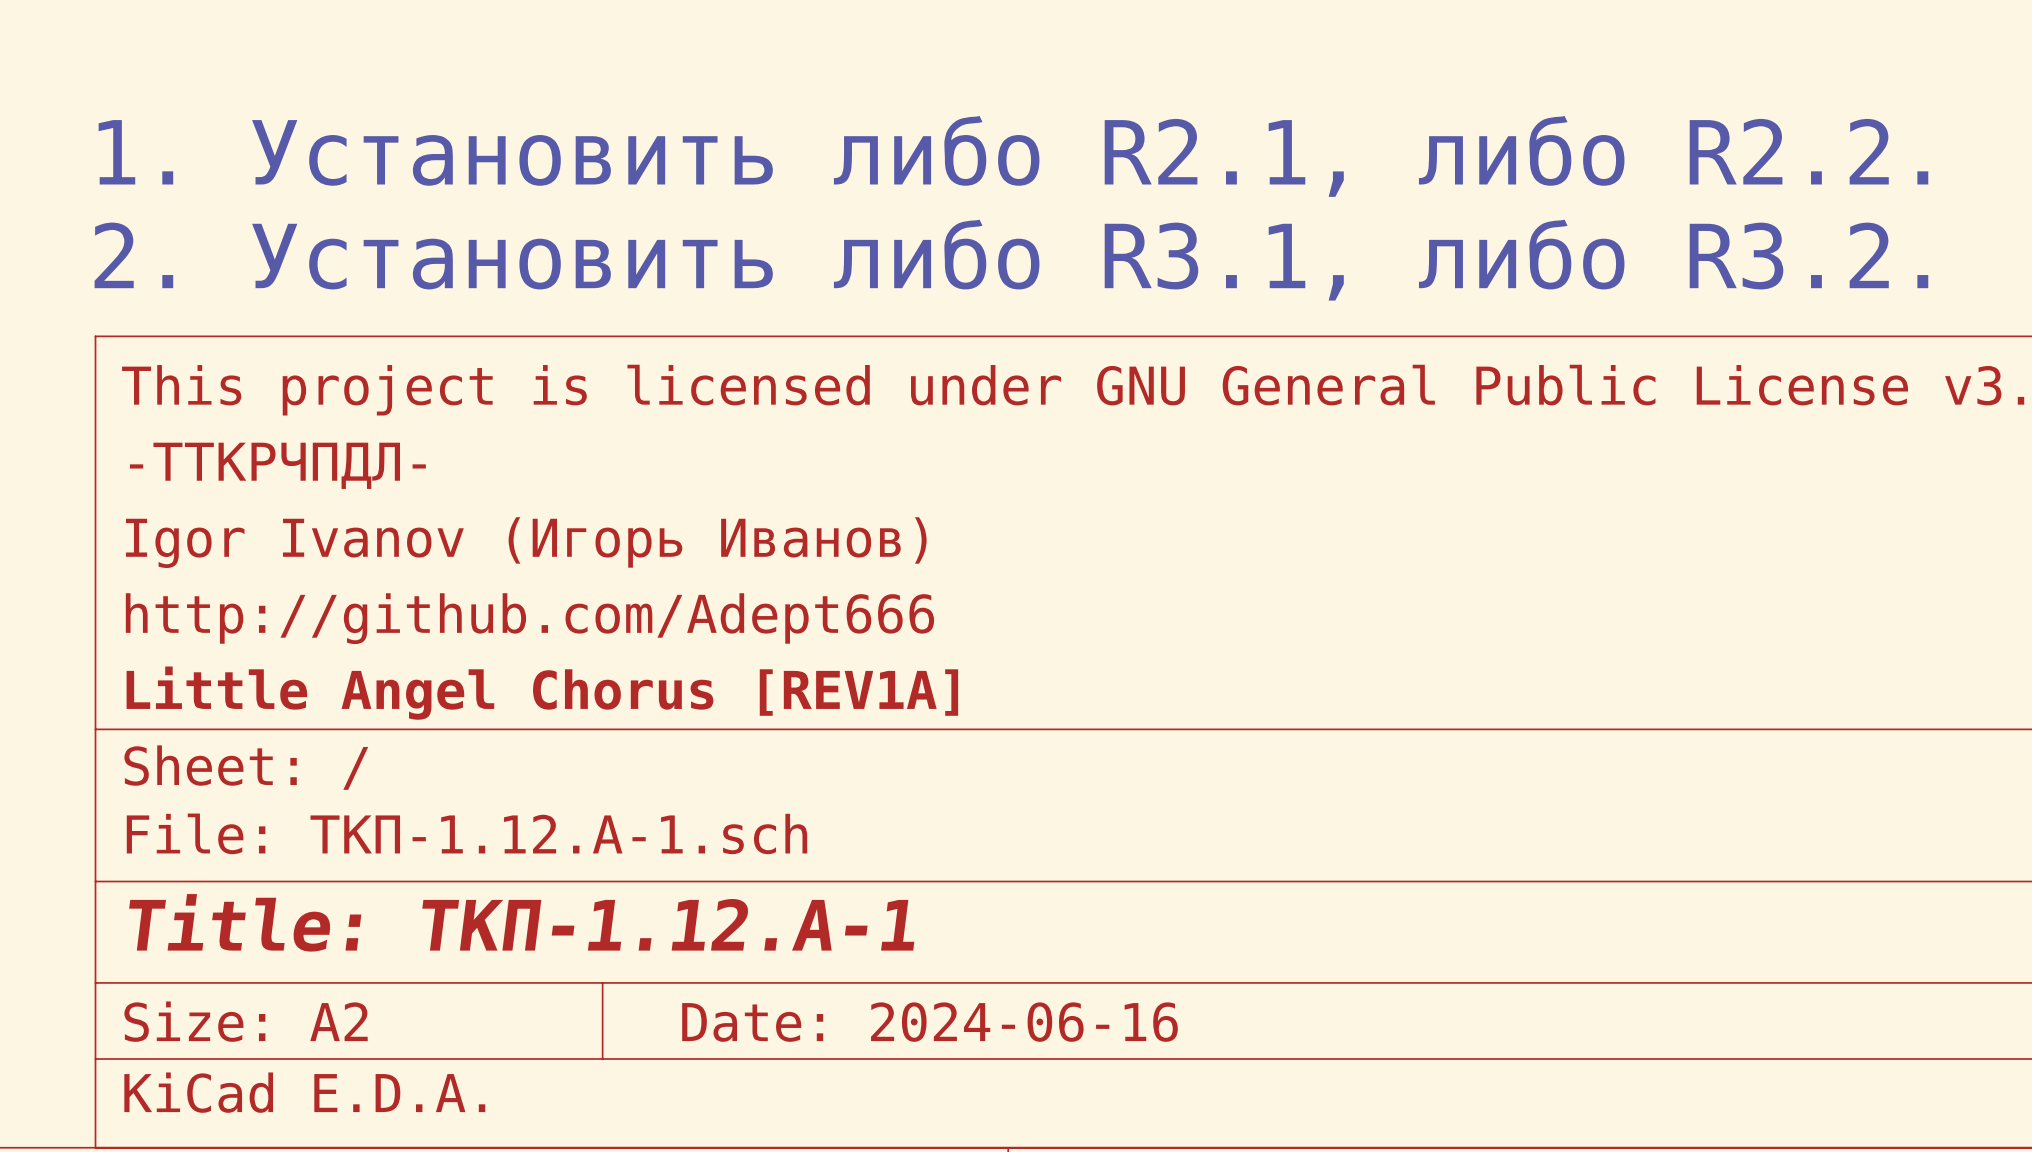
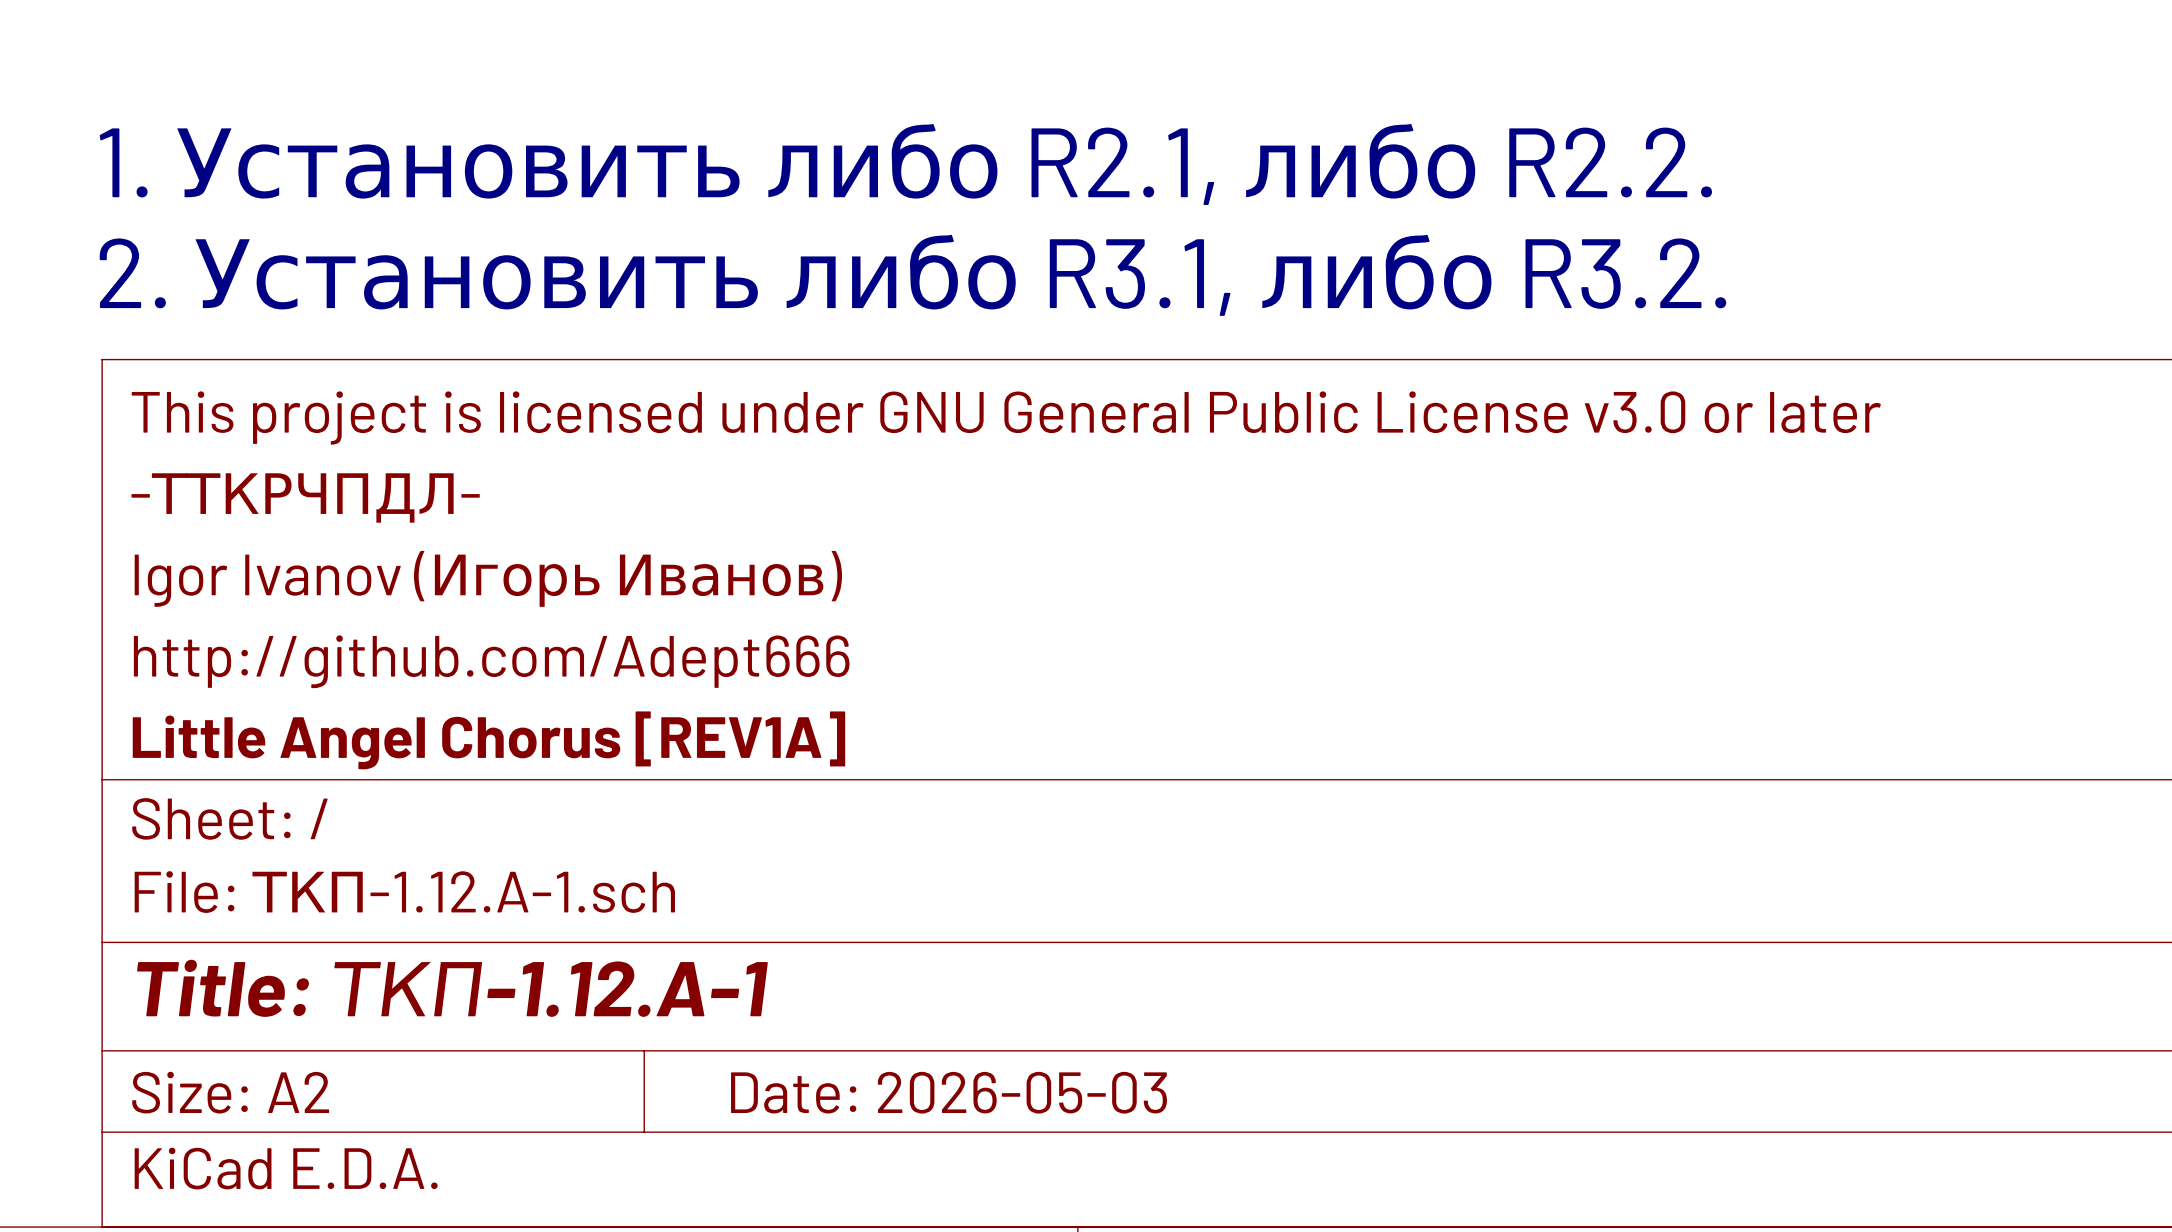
title block: Date: 2024-06-16 (930, 1022) -> Date: 2026-05-03 (949, 1092)

